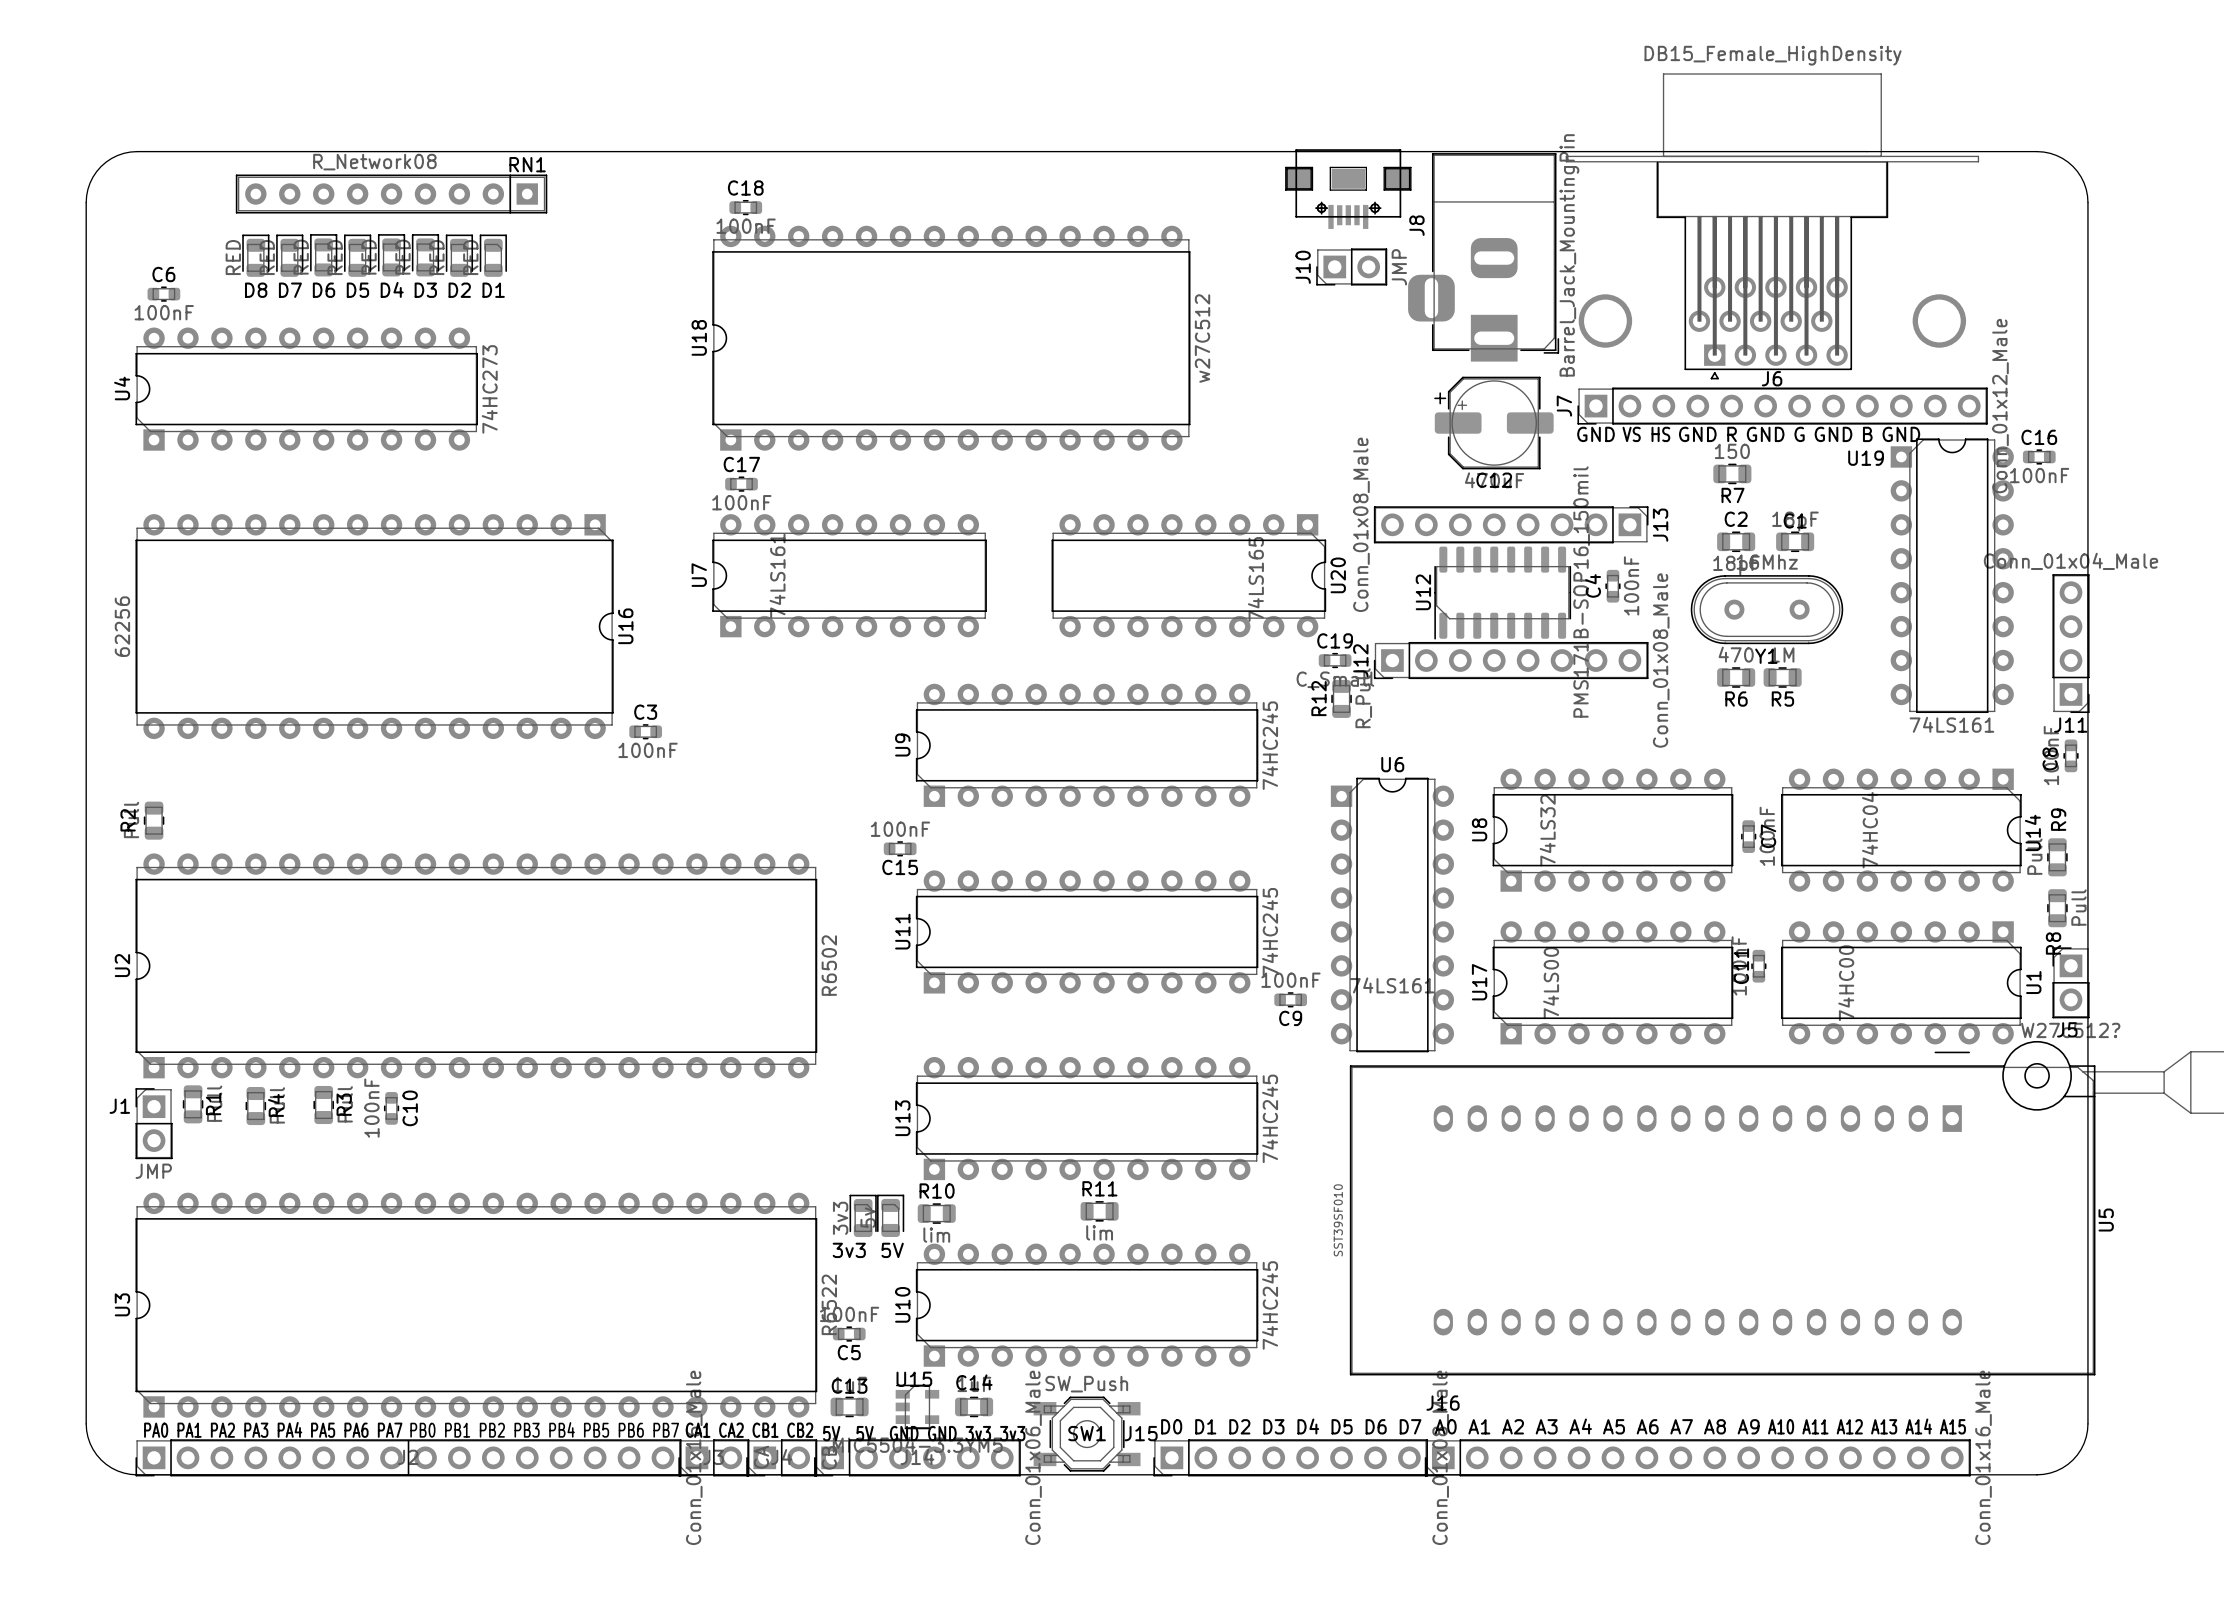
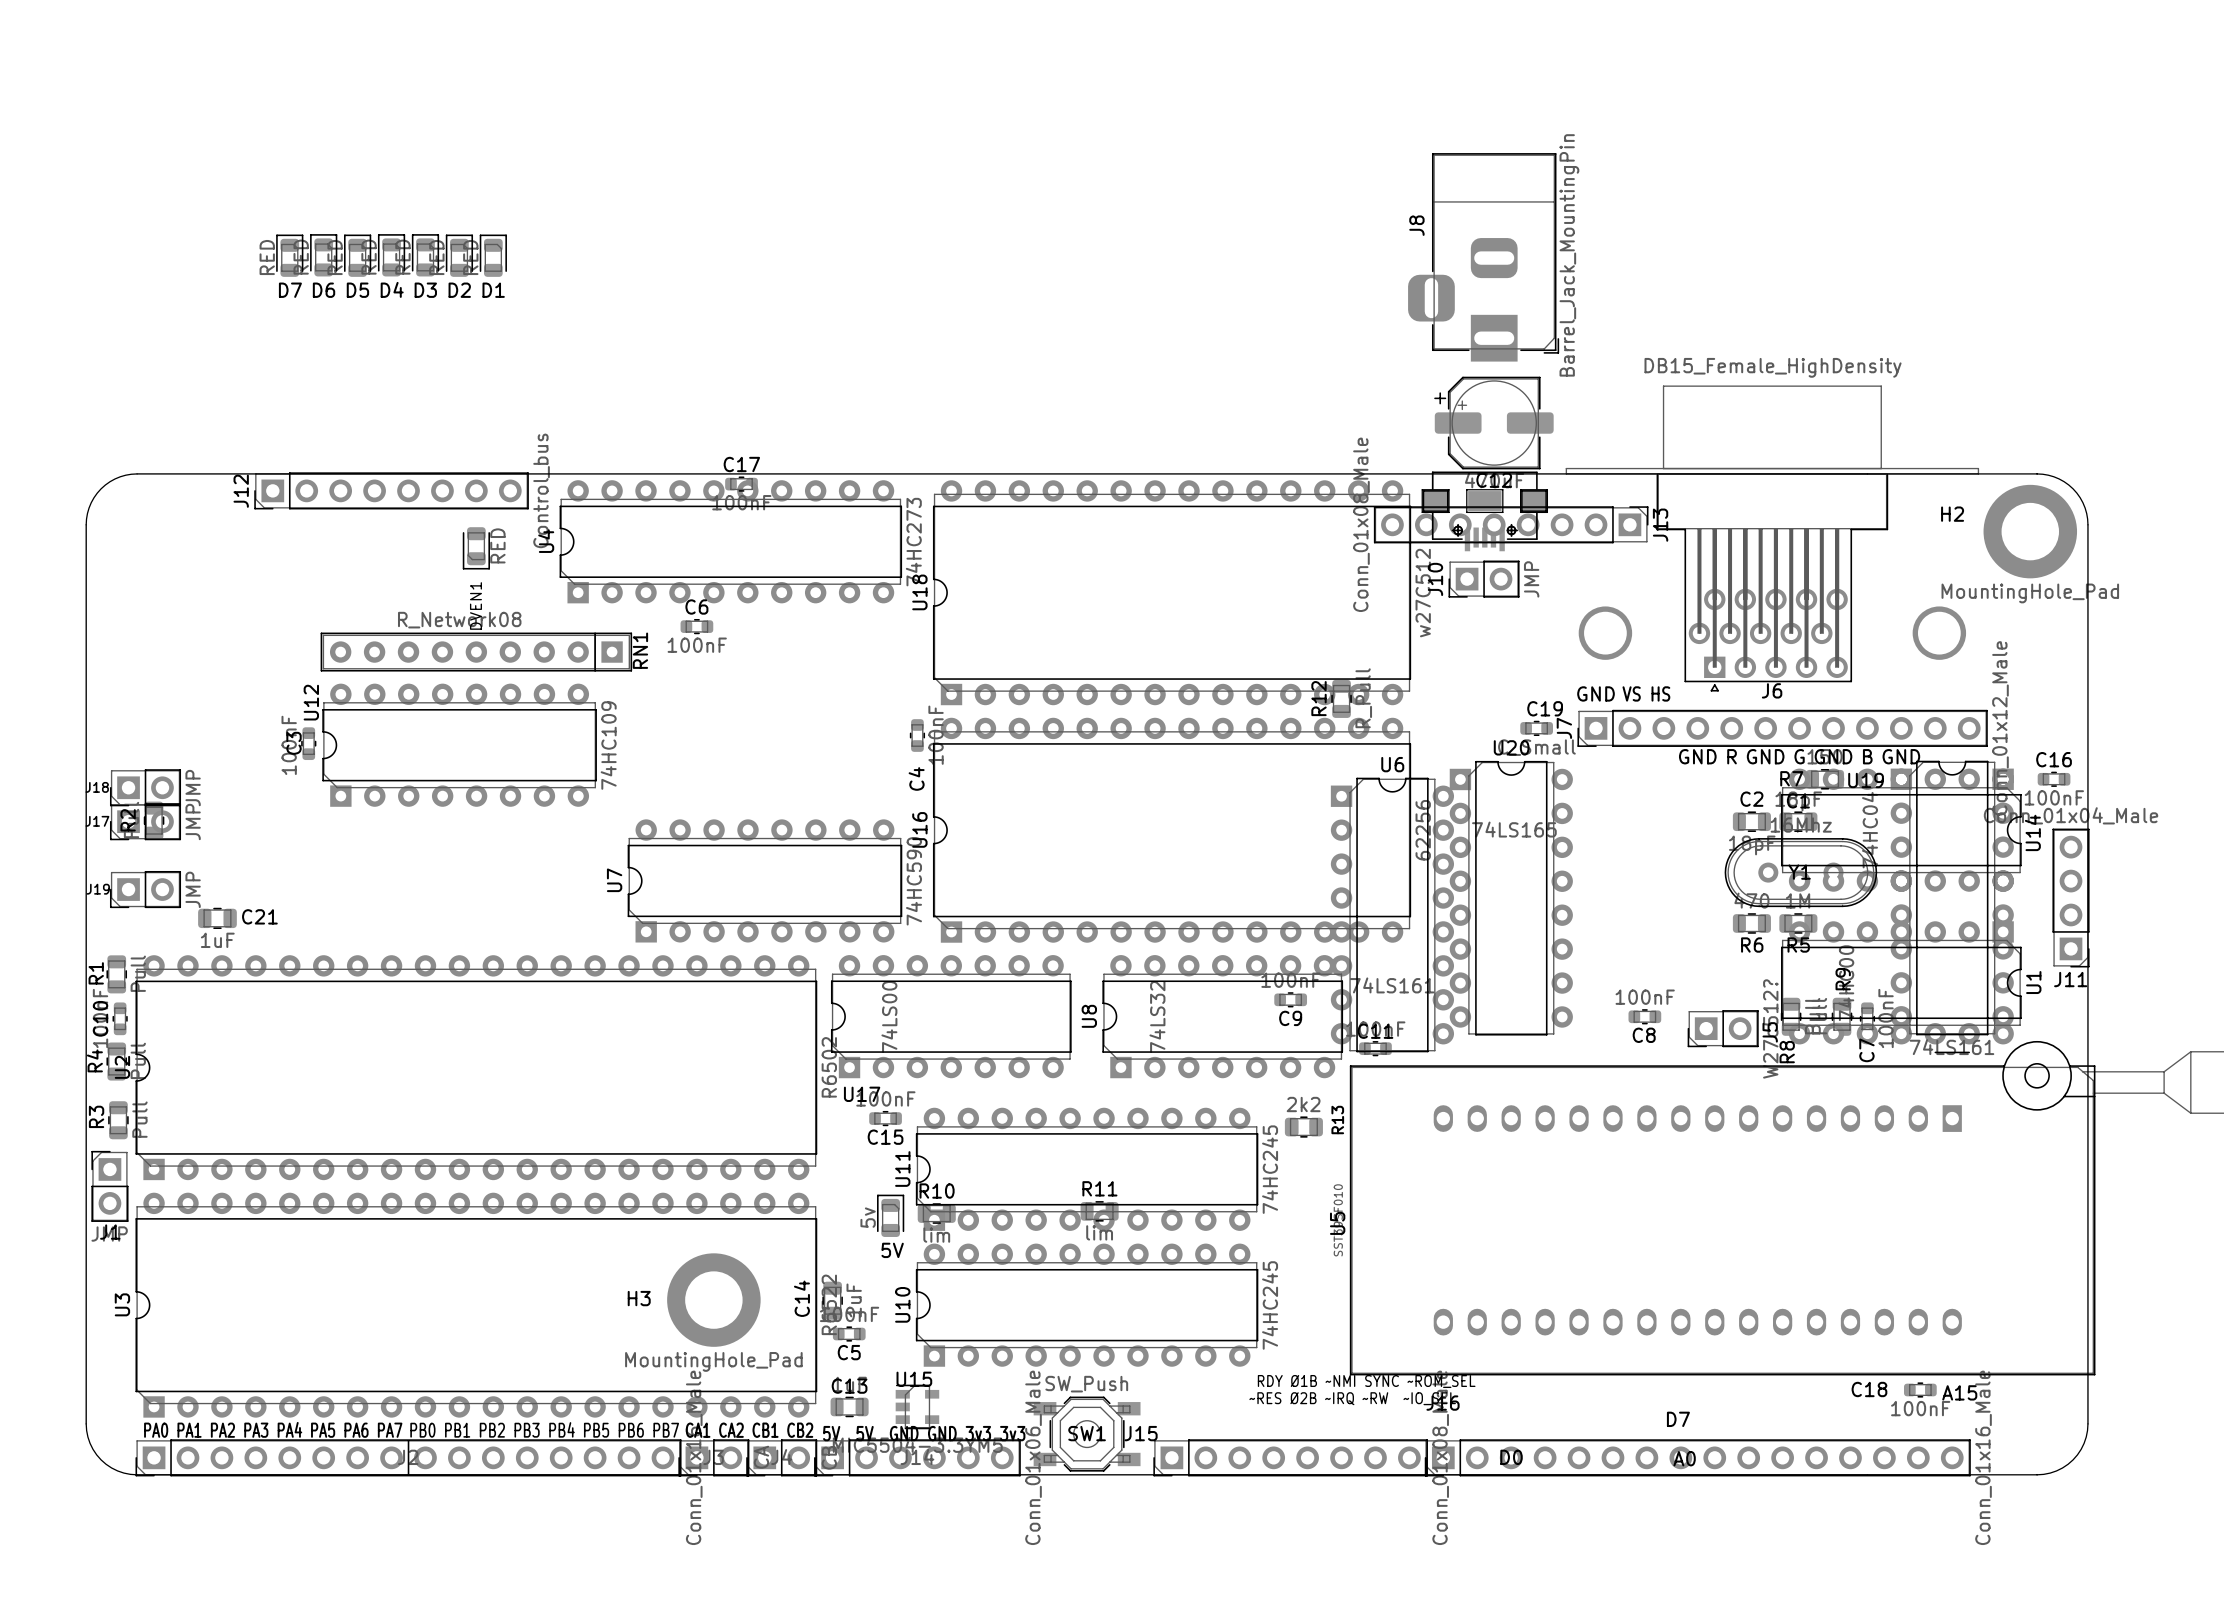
RN1 name rotation: 0° (527, 164) -> 90° counterclockwise (640, 650)
C18 name position: C18 (745, 187) -> C18 (1869, 1389)
part: (1348, 189) -> none
RN1 position: (391, 194) -> (476, 652)
C18 position: (745, 207) -> (1920, 1389)
J6 position: (1772, 226) -> (1772, 538)
D8: RED (255, 255) -> none
J10 position: (1351, 266) -> (1484, 579)
C6 position: (163, 294) -> (696, 626)
U18 position: (951, 338) -> (1172, 592)
U4 position: (306, 389) -> (730, 541)
J7 position: (1782, 406) -> (1782, 728)
text: GND (1596, 434) -> none
text position: VS HS (1646, 434) -> VS HS (1646, 693)
text: GND (1697, 434) -> none
text position: R (1732, 434) -> R (1732, 756)
text: GND (1765, 434) -> none
text position: G (1799, 434) -> G (1799, 756)
text: GND (1833, 434) -> none
text position: B (1867, 434) -> B (1867, 756)
text: GND (1901, 434) -> none
C16 position: (2039, 456) -> (2054, 779)
R7 position: (1732, 473) -> (1825, 779)
R7 name position: R7 (1733, 495) -> R7 (1791, 778)
part: none -> (1484, 511)
board edge: (86, 524) (86, 195) (90, 183) (101, 166) (117, 155) (137, 151) (2043, 152) (2056, 155) (2073, 166) (2081, 177) (2087, 195) (2087, 524) -> (86, 524) (91, 502) (101, 488) (115, 478) (137, 473) (1867, 473) (2048, 475) (2064, 481) (2076, 493) (2085, 508) (2087, 524)
H2: none -> MountingHole_Pad (2030, 531)
C2 position: (1736, 541) -> (1751, 821)
C1 position: (1795, 541) -> (1798, 821)
U12 footprint: [1434, 546, 1572, 640] -> [322, 683, 597, 807]
DVEN1: none -> RED (476, 548)
U7 position: (849, 575) -> (764, 880)
U20 rotation: 0° (1188, 575) -> 90° counterclockwise (1511, 898)
U20 position: (1188, 575) -> (1511, 898)
U19 position: (1952, 575) -> (1952, 898)
U7 value: 74LS161 (777, 576) -> 74HC590 (914, 881)
C4 name position: C4 (1593, 585) -> C4 (916, 778)
C4 position: (1612, 586) -> (917, 735)
U12 name position: U12 (1423, 592) -> U12 (311, 702)
U12 value: PMS171B-SOP16_150mil (1581, 592) -> 74HC109 (608, 745)
Y1 position: (1766, 609) -> (1800, 872)
U16 rotation: 0° (374, 626) -> 180° (1172, 830)
U16 position: (374, 626) -> (1172, 830)
C19 name position: C19 (1335, 640) -> C19 (1545, 708)
J11 position: (2071, 643) -> (2071, 898)
Y1 name position: Y1 (1766, 656) -> Y1 (1799, 872)
C19 position: (1335, 660) -> (1536, 728)
J12 position: (1511, 660) -> (391, 490)
J12 value: Conn_01x08_Male (1661, 660) -> Control_bus (541, 490)
R6 position: (1736, 677) -> (1751, 923)
R5 position: (1782, 677) -> (1798, 923)
text: none -> GND (1596, 693)
C3 rotation: 0° (645, 731) -> 90° clockwise (308, 743)
C3 position: (645, 731) -> (308, 743)
U9: 74HC245 (1087, 745) -> none
C8 rotation: 0° (2071, 755) -> 90° clockwise (1644, 1016)
C8 position: (2071, 755) -> (1644, 1016)
text: none -> GND (1697, 756)
text: none -> GND (1765, 756)
text: none -> GND (1833, 756)
text: none -> GND (1901, 756)
J18: none -> JMP (145, 787)
J17: none -> JMP (145, 821)
U8 position: (1612, 830) -> (1222, 1016)
C7 position: (1748, 836) -> (1867, 1018)
C7 name position: C7 (1768, 836) -> C7 (1866, 1050)
C15 position: (900, 848) -> (885, 1118)
R9 position: (2057, 857) -> (1841, 1016)
J19: none -> JMP (145, 889)
R8 position: (2057, 908) -> (1791, 1016)
C21: none -> 1uF (217, 918)
U11 position: (1087, 931) -> (1087, 1169)
U2 position: (476, 965) -> (476, 1067)
C11 rotation: 0° (1758, 966) -> 90° clockwise (1375, 1048)
C11 position: (1758, 966) -> (1375, 1048)
U17 name rotation: 0° (1479, 982) -> 90° clockwise (862, 1094)
U17 name position: U17 (1479, 982) -> U17 (862, 1094)
U17 position: (1612, 982) -> (951, 1016)
J5 rotation: 0° (2071, 982) -> 90° counterclockwise (1723, 1028)
J5 position: (2071, 982) -> (1723, 1028)
R1 position: (193, 1104) -> (116, 974)
R1 name position: R1 (213, 1104) -> R1 (96, 973)
R3 position: (323, 1104) -> (118, 1120)
R3 name position: R3 (344, 1104) -> R3 (96, 1116)
R4 name position: R4 (276, 1105) -> R4 (94, 1060)
J1 name position: J1 (119, 1106) -> J1 (110, 1232)
R4 position: (255, 1106) -> (116, 1061)
C10 position: (391, 1108) -> (120, 1018)
C10 name position: C10 (410, 1108) -> C10 (100, 1018)
U13: 74HC245 (1087, 1118) -> none
J1 position: (154, 1123) -> (109, 1186)
R13: none -> 2k2 (1303, 1127)
3v3: 3v3 (863, 1215) -> none
U5 name position: U5 (2106, 1220) -> U5 (1337, 1223)
H3: none -> MountingHole_Pad (713, 1300)
text: none -> RDY Ø1B ~NMI SYNC ~ROM_SEL (1366, 1381)
C14 name position: C14 (974, 1382) -> C14 (801, 1298)
text: none -> A15 (1959, 1392)
text: none -> ~RES Ø2B ~IRQ ~RW ~IO_SEL (1352, 1398)
C14 rotation: 0° (974, 1406) -> 90° clockwise (832, 1300)
C14 position: (974, 1406) -> (832, 1300)
text: none -> D7 (1678, 1419)
text: D0 D1 D2 D3 D4 D5 D6 D7 (1291, 1426) -> none
text: A0 A1 A2 A3 A4 A5 A6 A7 A8 A9 (1597, 1426) -> none
text: A10 A11 A12 A13 A14 A15 (1866, 1426) -> none
text: none -> D0 (1511, 1457)
text: none -> A0 (1684, 1458)

